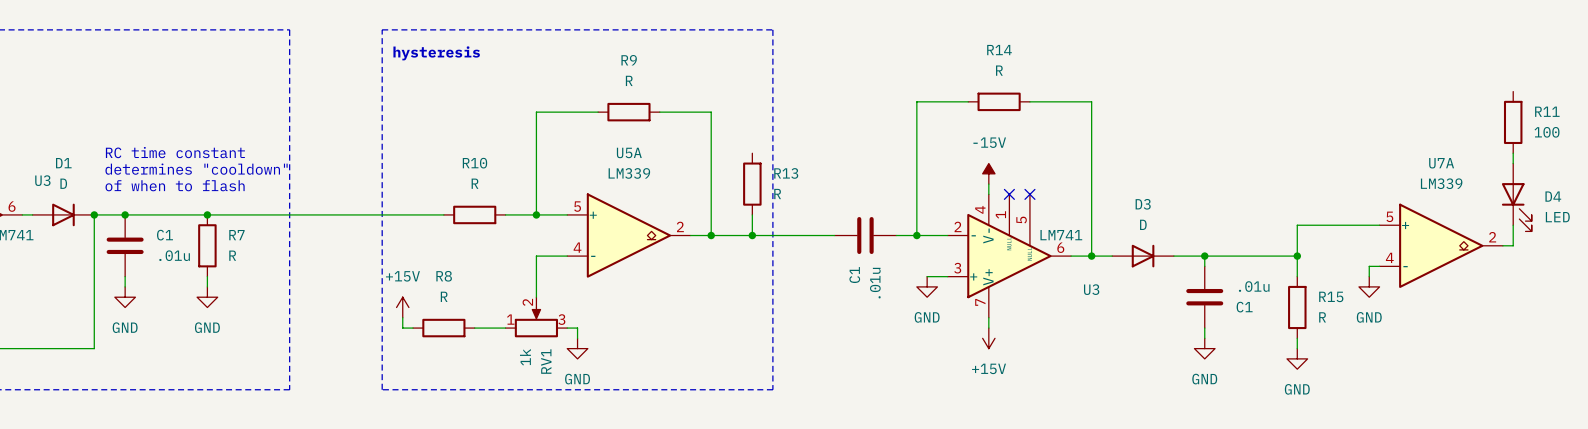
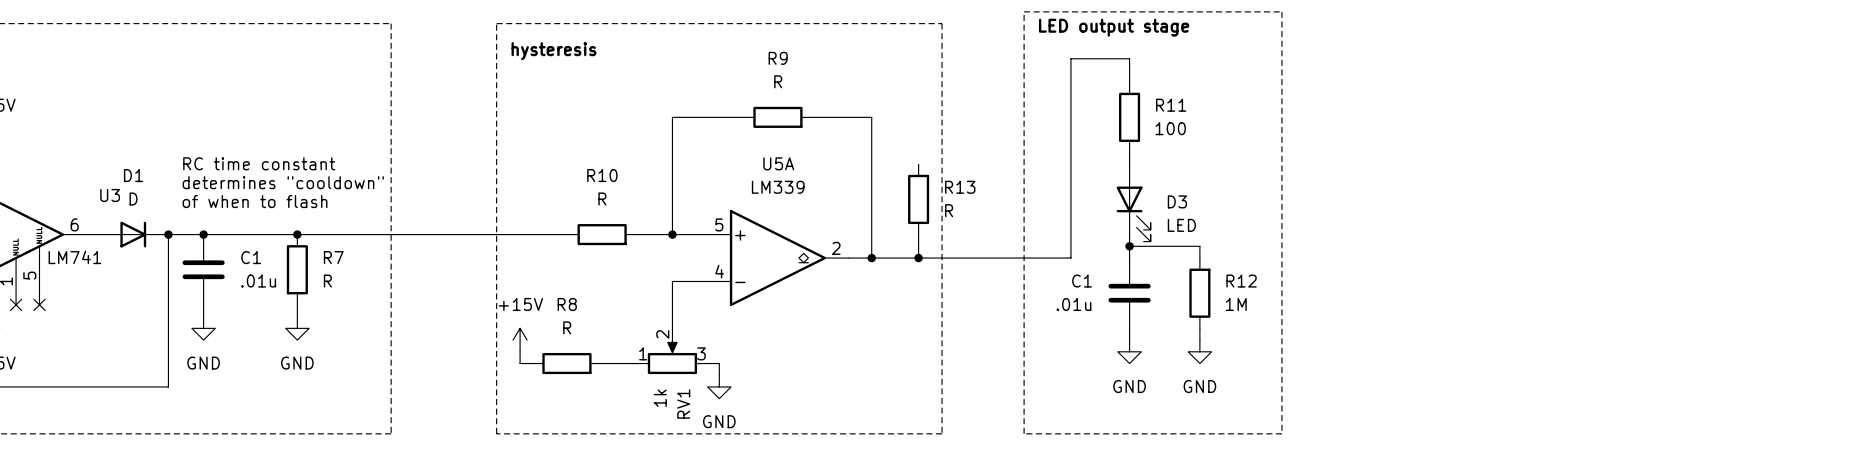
line: none -> (1024, 11) (1281, 11) (1281, 433) (1024, 433) (1024, 11)
text: none -> LED output stage (1114, 27)
wire: none -> (1129, 82) (1129, 58) (1070, 58) (1070, 258) (1012, 258)
wire: (968, 101) (916, 101) (916, 235) -> none
R14: R (999, 101) -> none
wire: (1029, 101) (1091, 101) (1091, 256) -> none
R11 position: (1513, 122) -> (1129, 117)
wire: (1513, 153) (1513, 163) -> none
power symbol: -15V (988, 173) -> none
wire: (988, 184) (988, 194) -> (1129, 152) (1129, 164)
no-connect mark: (1009, 194) -> none
no-connect mark: (1029, 194) -> none
D4: LED (1516, 197) -> none
D3 name position: D3 (1143, 204) -> D3 (1177, 201)
wire: none -> (1129, 234) (1129, 258)
D3 value: D (1143, 224) -> LED (1181, 225)
wire: none -> (1129, 246) (1199, 246) (1199, 258)
wire: (1379, 225) (1297, 225) (1297, 276) -> none
wire: (1513, 225) (1513, 245) (1502, 245) -> none
C1 rotation: 0° (865, 235) -> 90° clockwise (1129, 293)
C1 position: (865, 235) -> (1129, 293)
wire: (896, 235) (947, 235) -> none
junction position: (916, 235) -> (1129, 246)
D3 symbol: [1112, 244, 1174, 268] -> [1116, 164, 1151, 242]
U7A: LM339 (1441, 245) -> none
U3: LM741 (1009, 256) -> none
wire: (1071, 256) (1112, 256) -> none
junction: (1091, 256) -> none
wire: (1173, 256) (1297, 256) -> none
wire: (1204, 256) (1204, 266) -> none
junction: (1204, 256) -> none
junction: (1297, 256) -> none
R12: none -> 1M (1199, 293)
wire: (1379, 266) (1369, 266) (1369, 276) -> none
wire: (927, 276) (947, 276) -> none
power symbol position: GND (927, 286) -> GND (1129, 351)
power symbol: GND (1369, 286) -> none
wire: none -> (1129, 328) (1129, 340)
C1: .01u (1204, 297) -> none
R15: R (1297, 307) -> none
wire: (988, 317) (988, 328) -> (1199, 328) (1199, 340)
power symbol: none -> GND (1199, 351)
wire: (1204, 328) (1204, 338) -> none
power symbol: +15V (988, 338) -> none
wire: (1297, 338) (1297, 348) -> none
power symbol: GND (1204, 348) -> none
power symbol: GND (1297, 358) -> none

